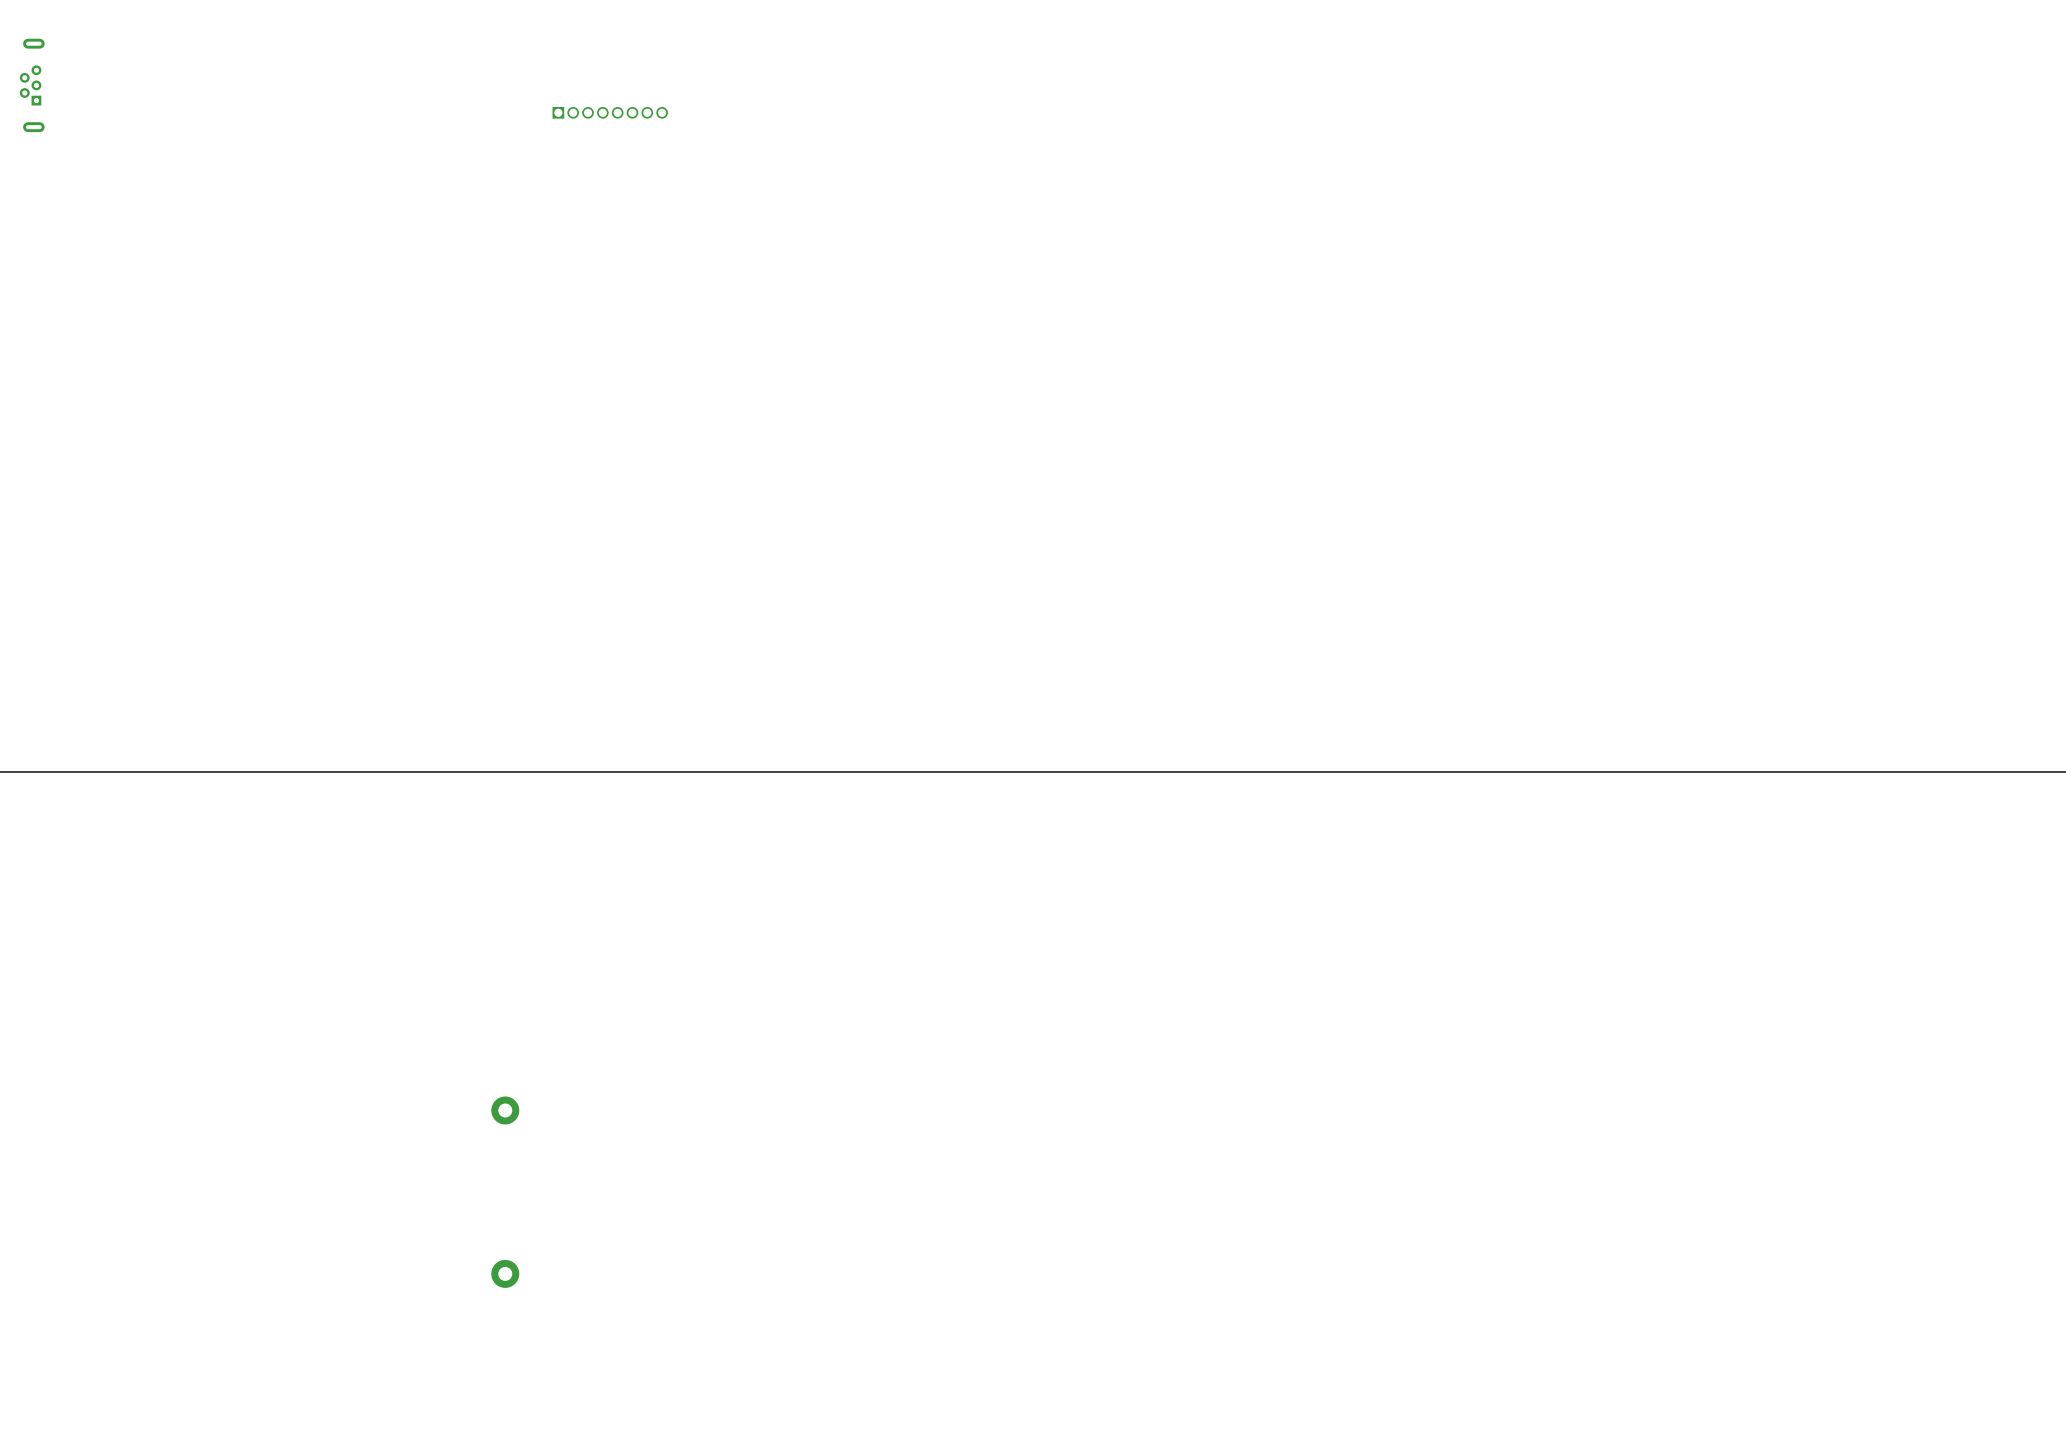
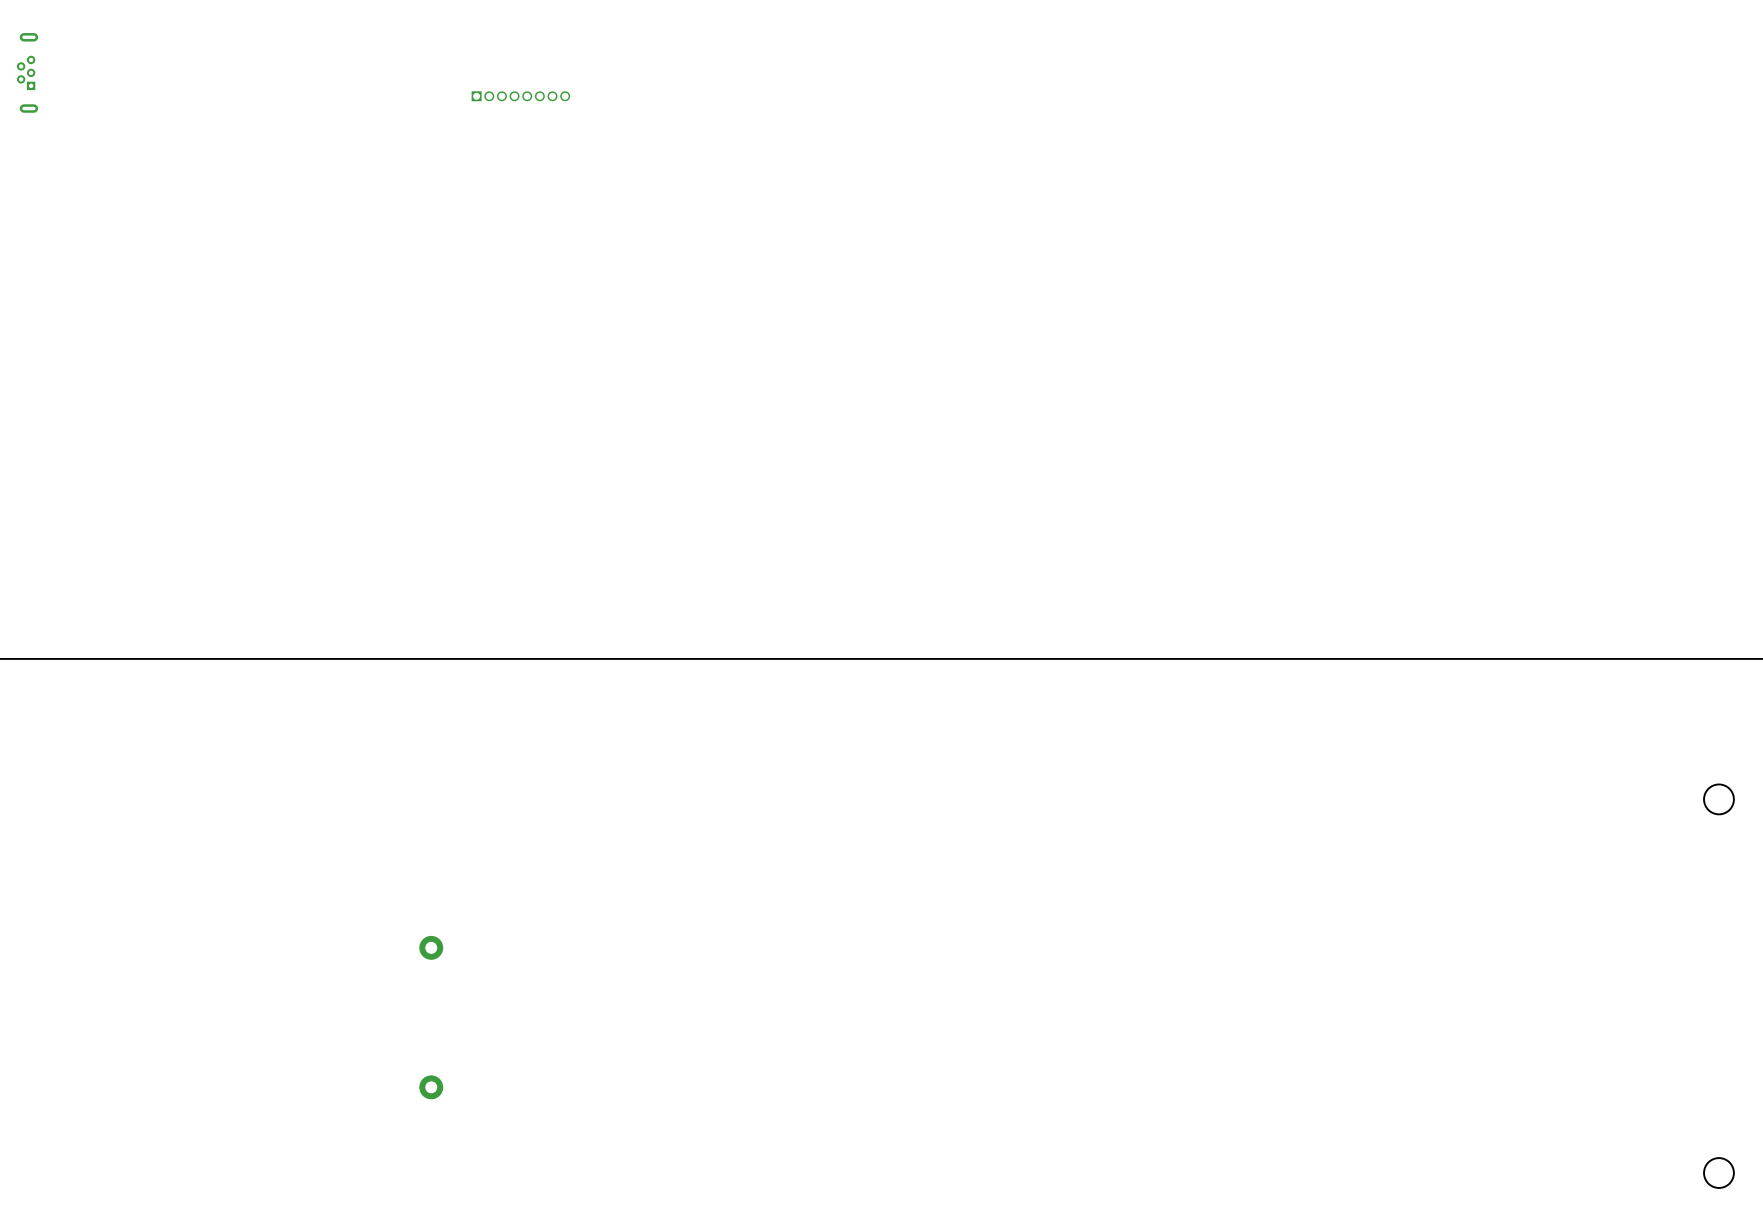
round board edge: none -> [1703, 783, 1735, 815]
round board edge: none -> [1703, 1157, 1735, 1189]

